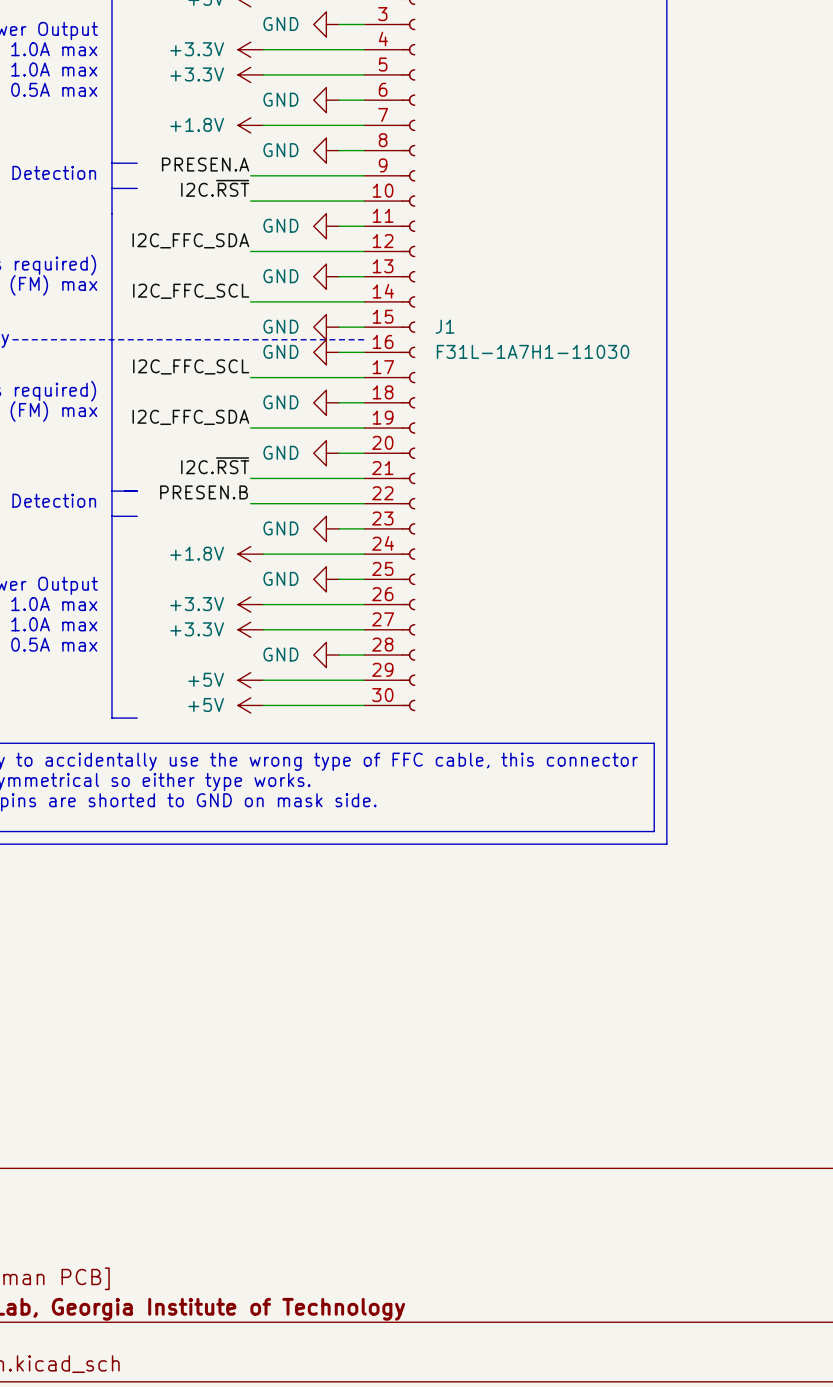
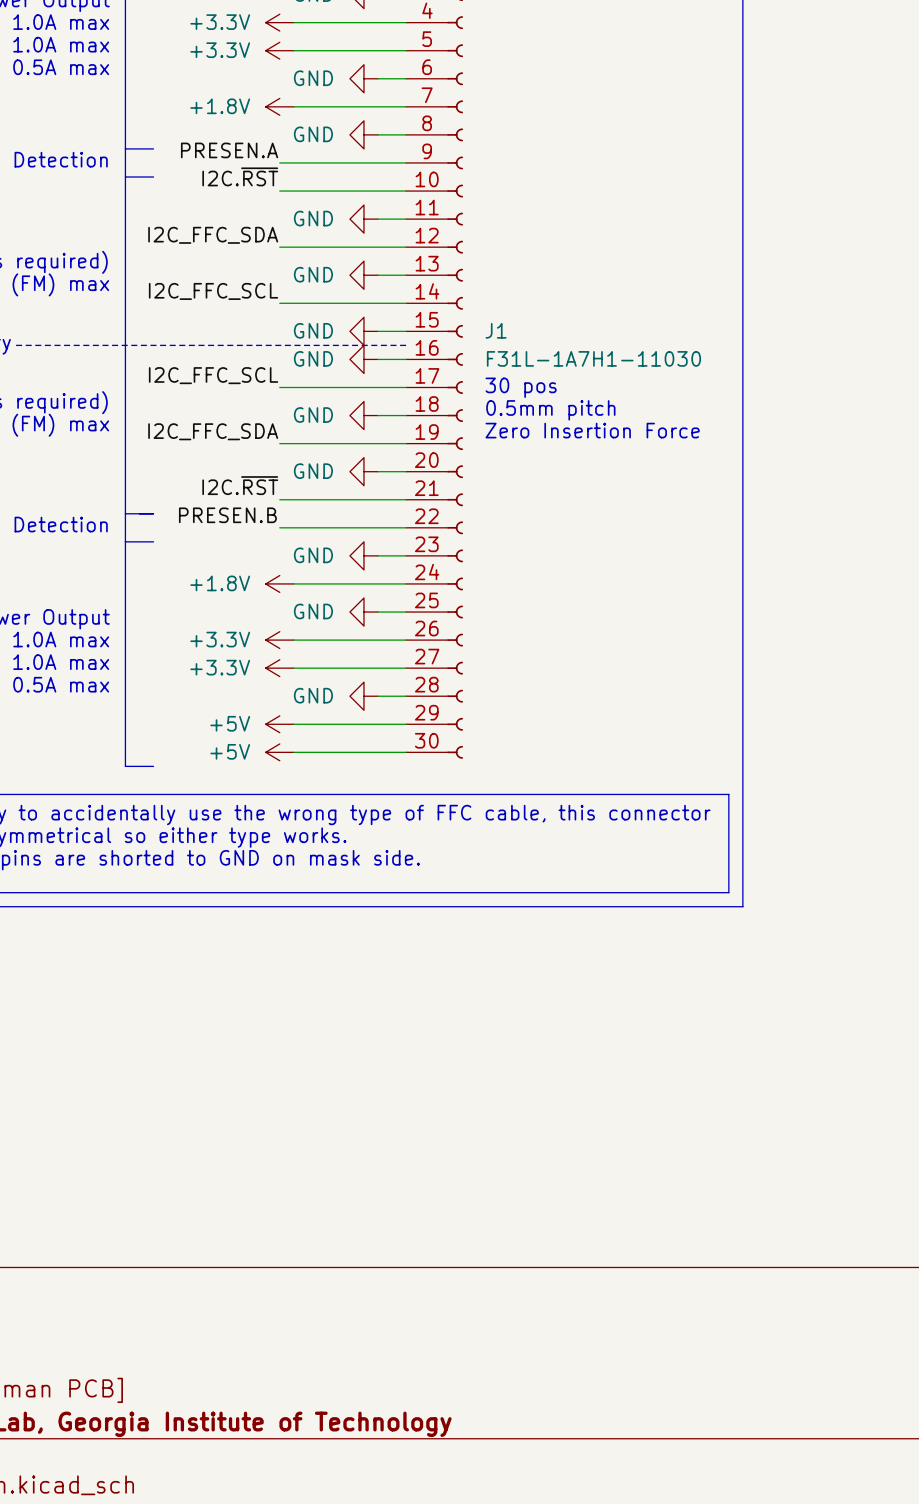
text: none -> 30 pos (521, 387)
text: none -> 0.5mm pitch (550, 410)
text: none -> Zero Insertion Force (592, 430)

